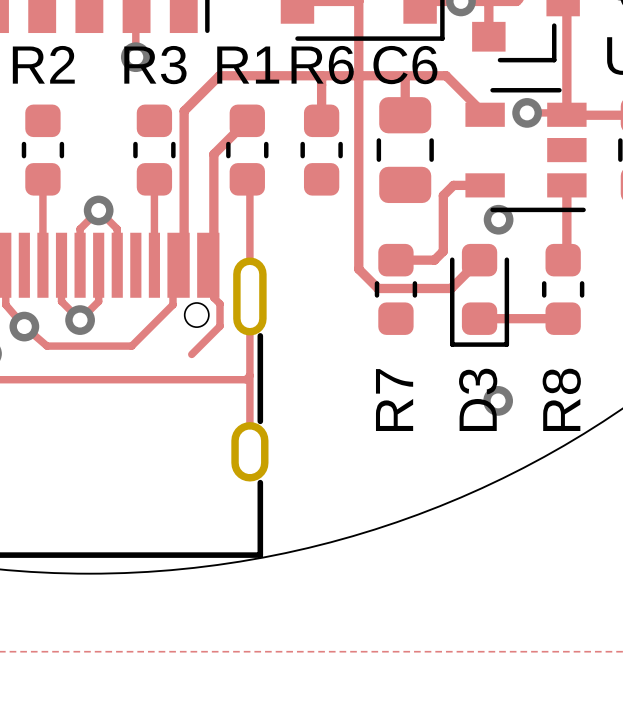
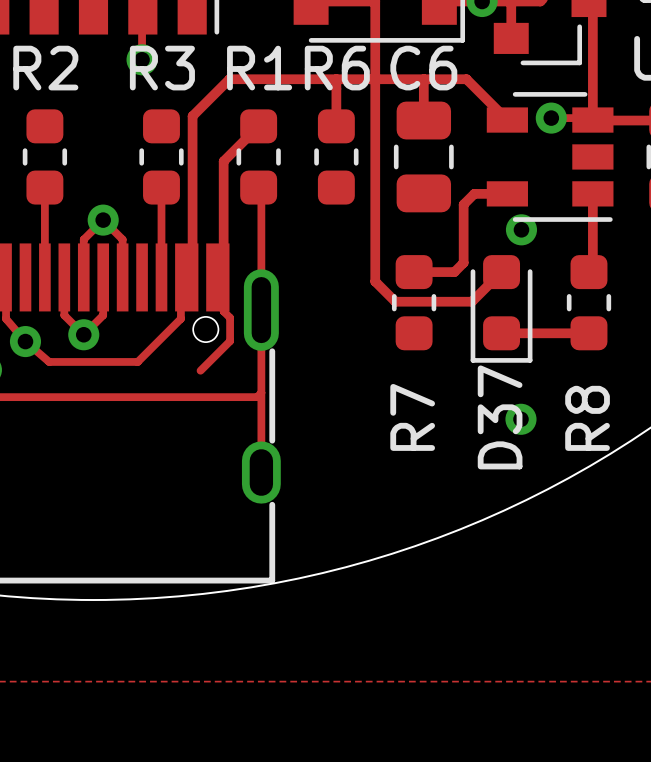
D3 name: D3 (478, 399) -> D37 (500, 417)

